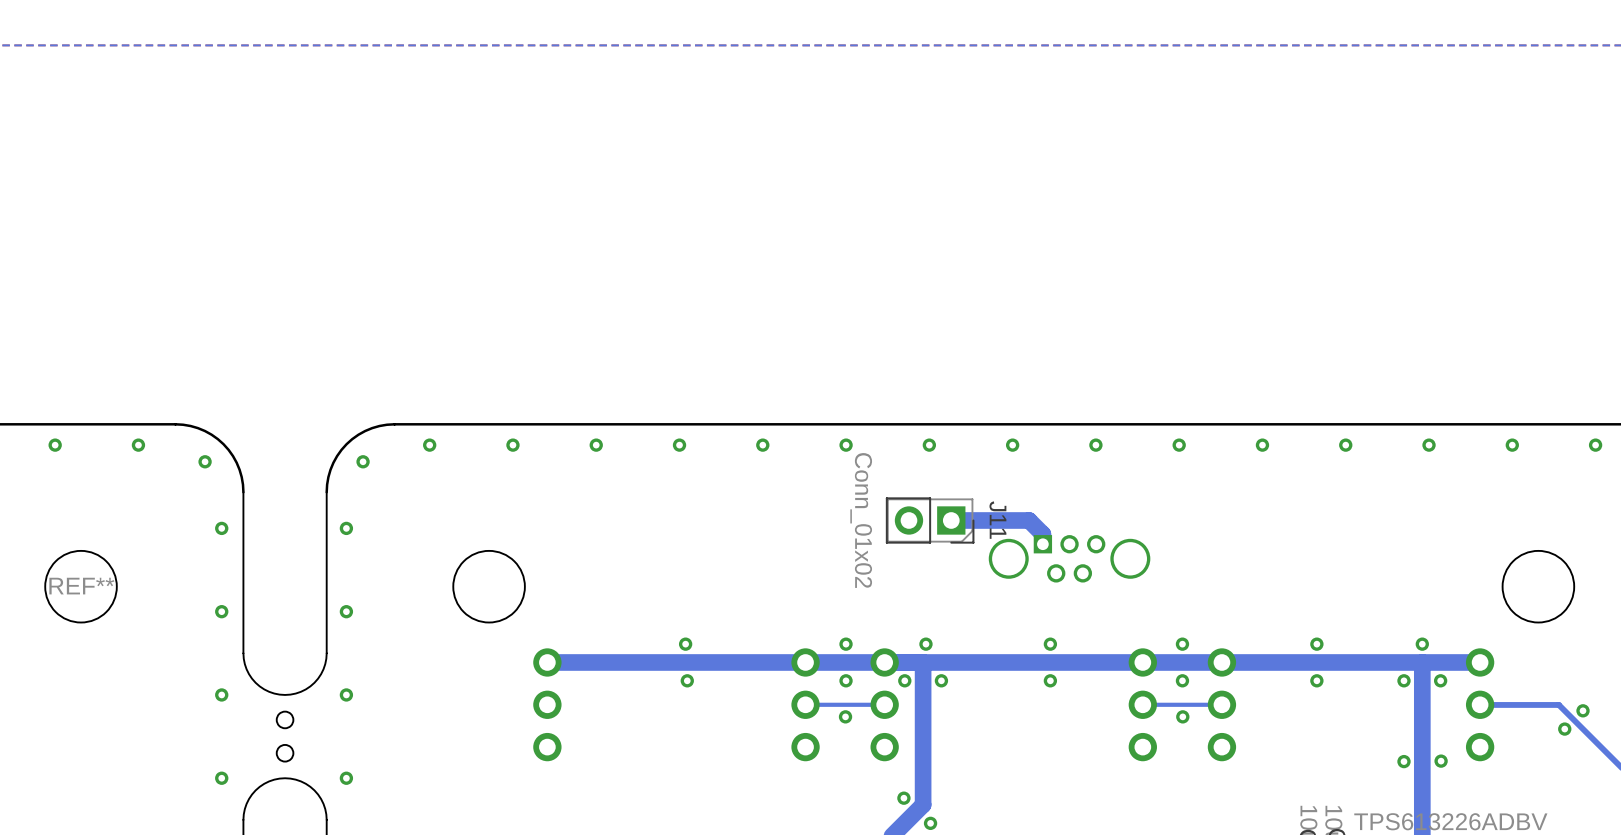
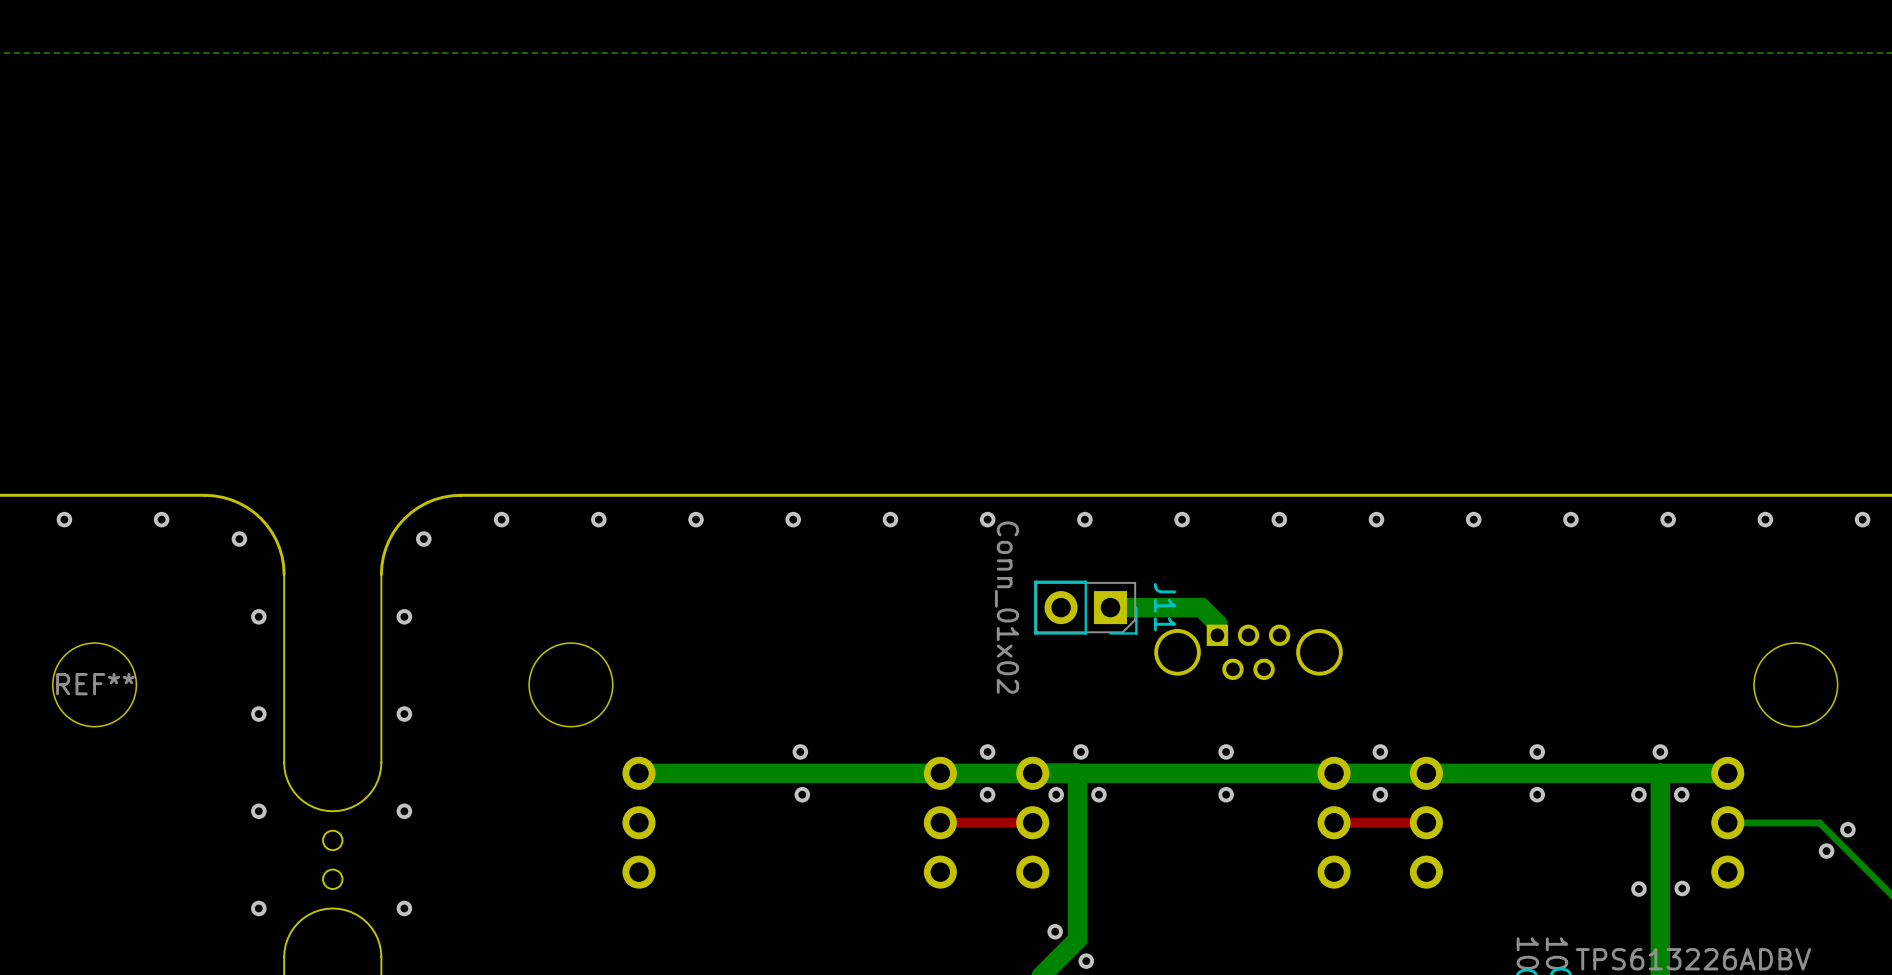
bottom track: (884, 704) (805, 704) -> none
top track: none -> (1032, 822) (940, 822)
bottom track: (1221, 704) (1142, 704) -> none
top track: none -> (1426, 822) (1334, 822)
via: (845, 716) -> none
via: (1182, 716) -> none

